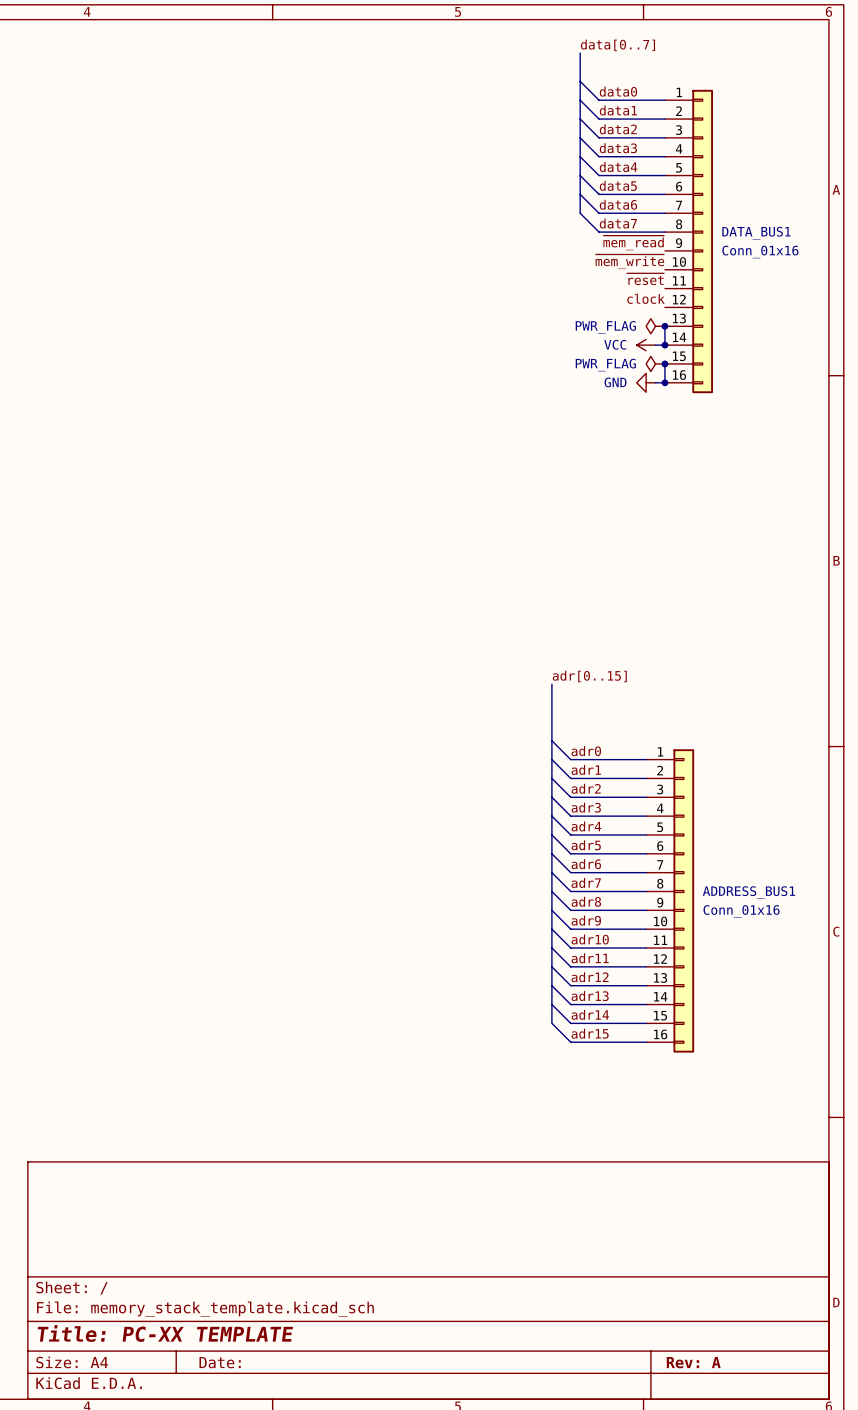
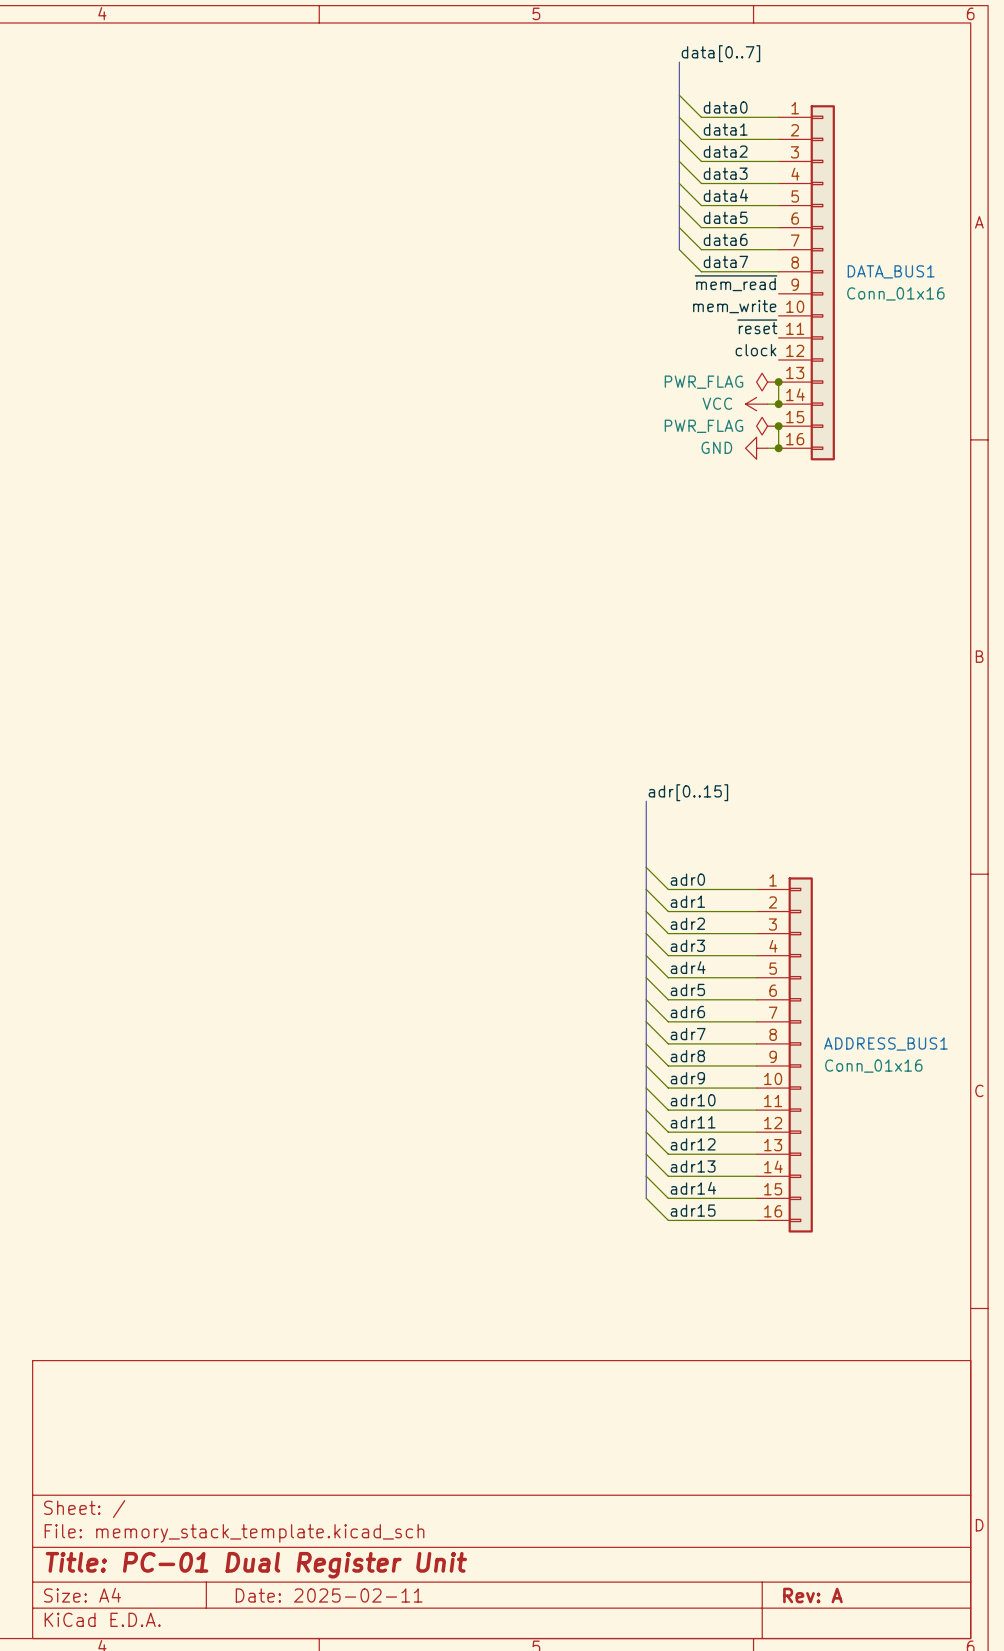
label: ~{mem_write} (629, 261) -> mem_write (734, 306)
title block: Title: PC-XX TEMPLATE (165, 1333) -> Title: PC-01 Dual Register Unit (256, 1565)
title block: Date: (220, 1362) -> Date: 2025-02-11 (329, 1595)

